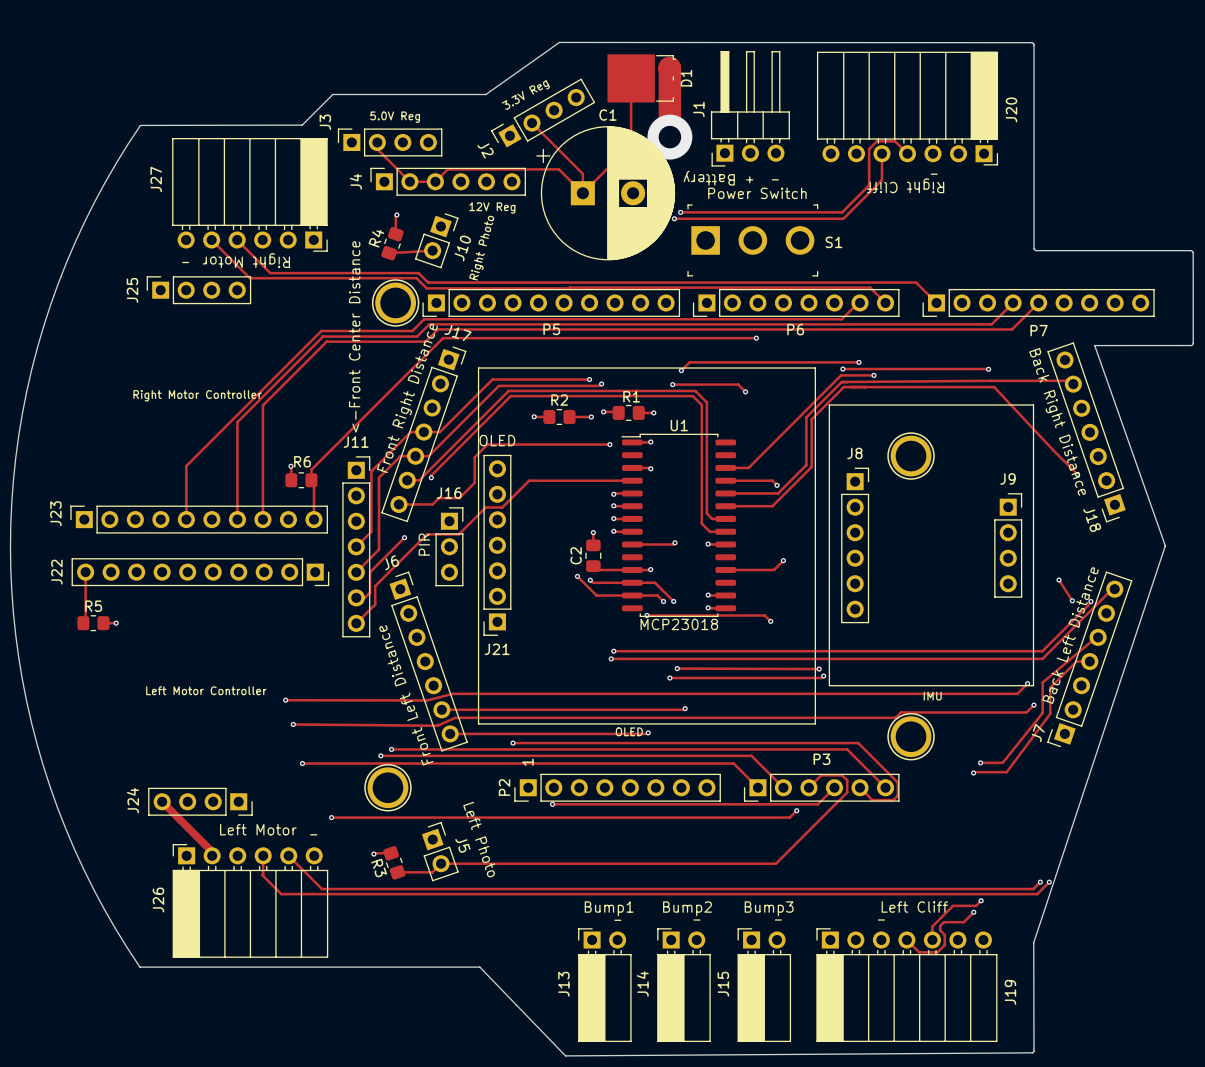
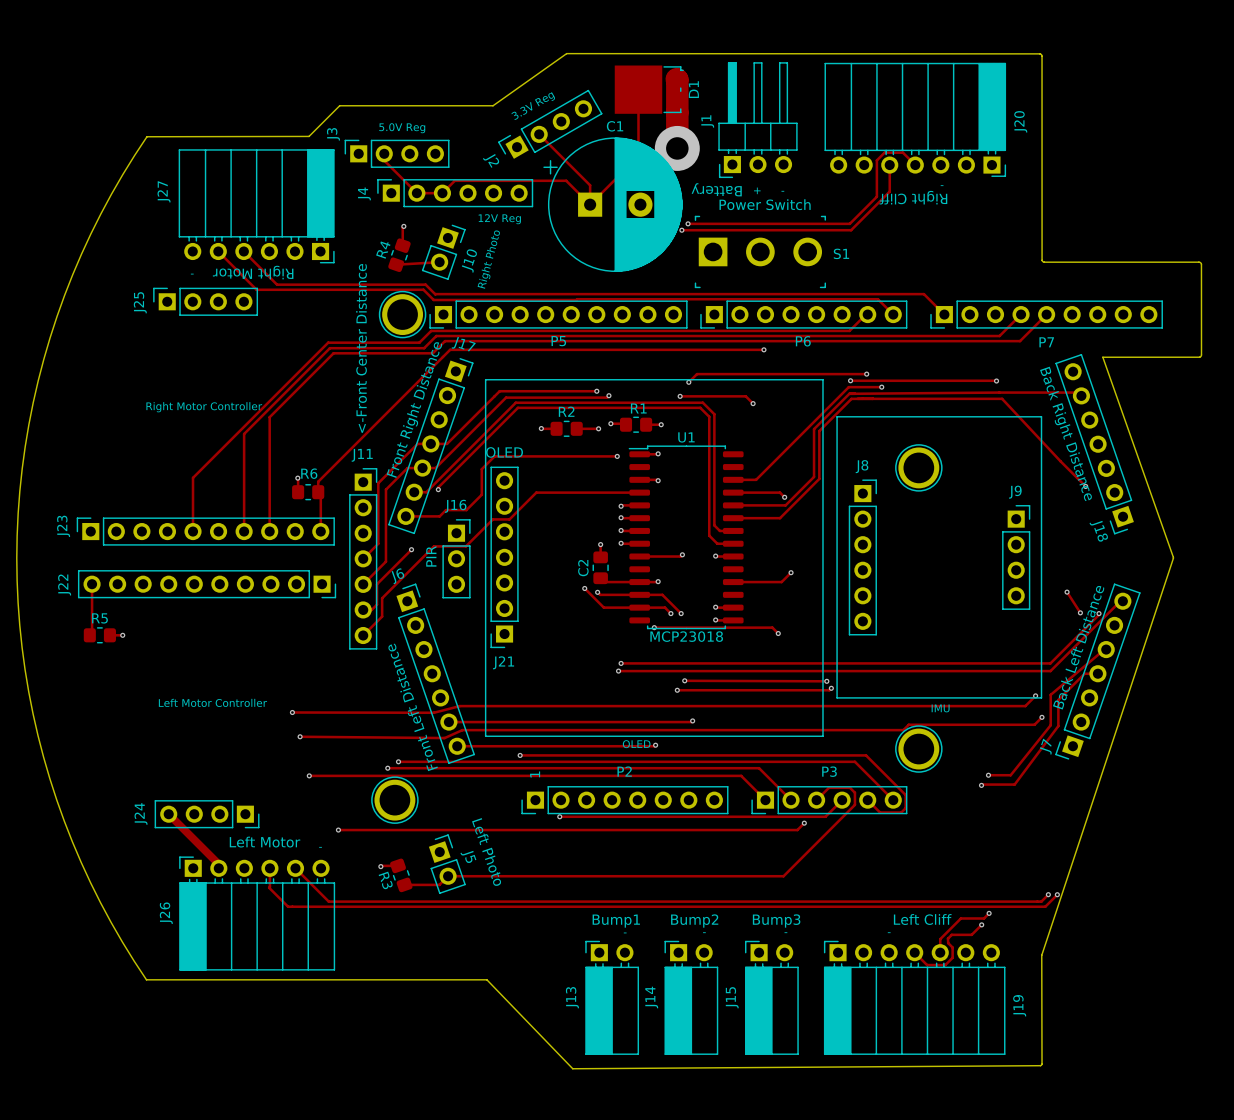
P2 name rotation: 0° (504, 787) -> 90° clockwise (624, 771)
P2 name position: P2 (504, 787) -> P2 (624, 771)

